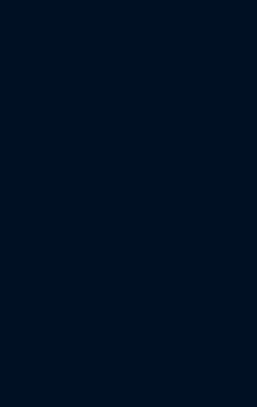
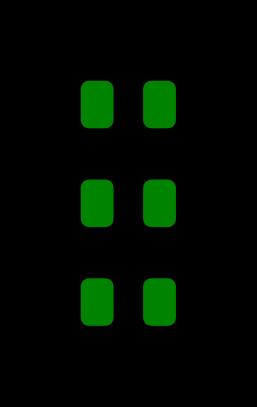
part: none -> (128, 104)
part: none -> (128, 203)
part: none -> (128, 302)

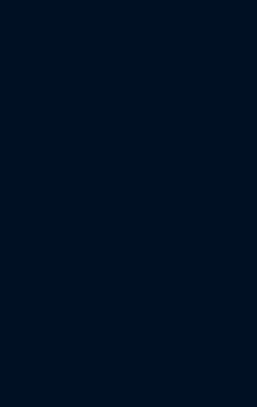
part: (128, 104) -> none
part: (128, 203) -> none
part: (128, 302) -> none

